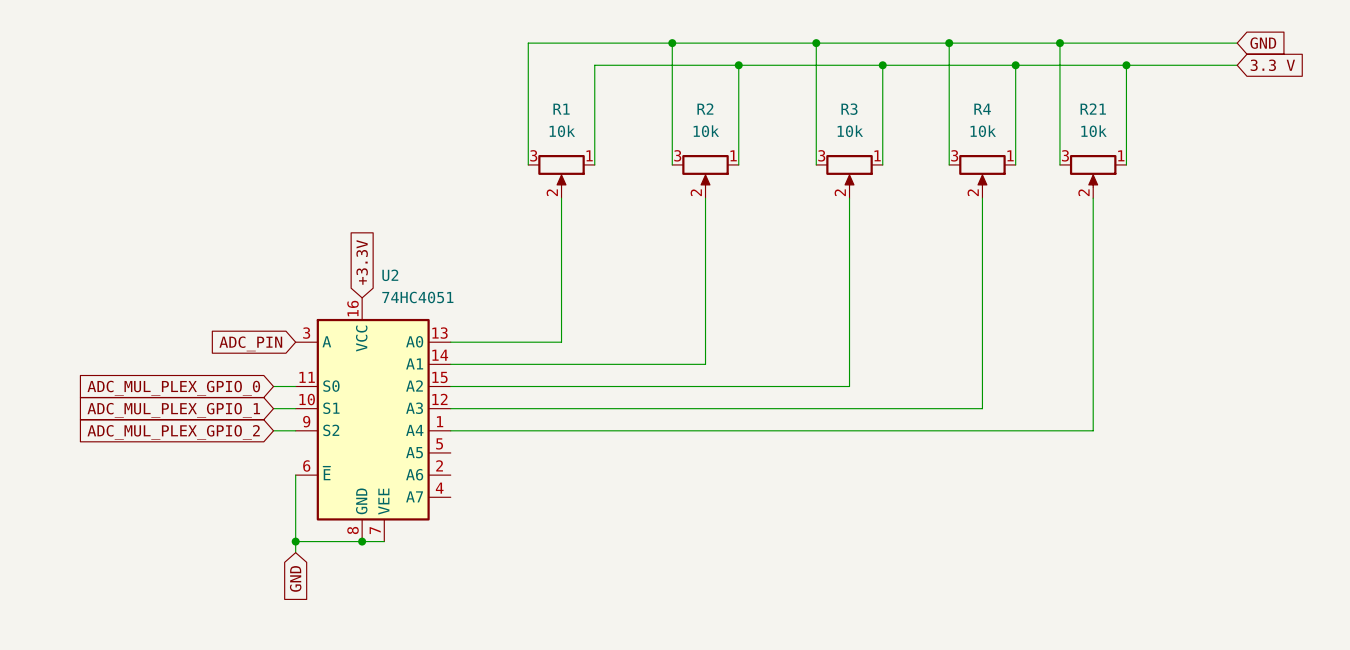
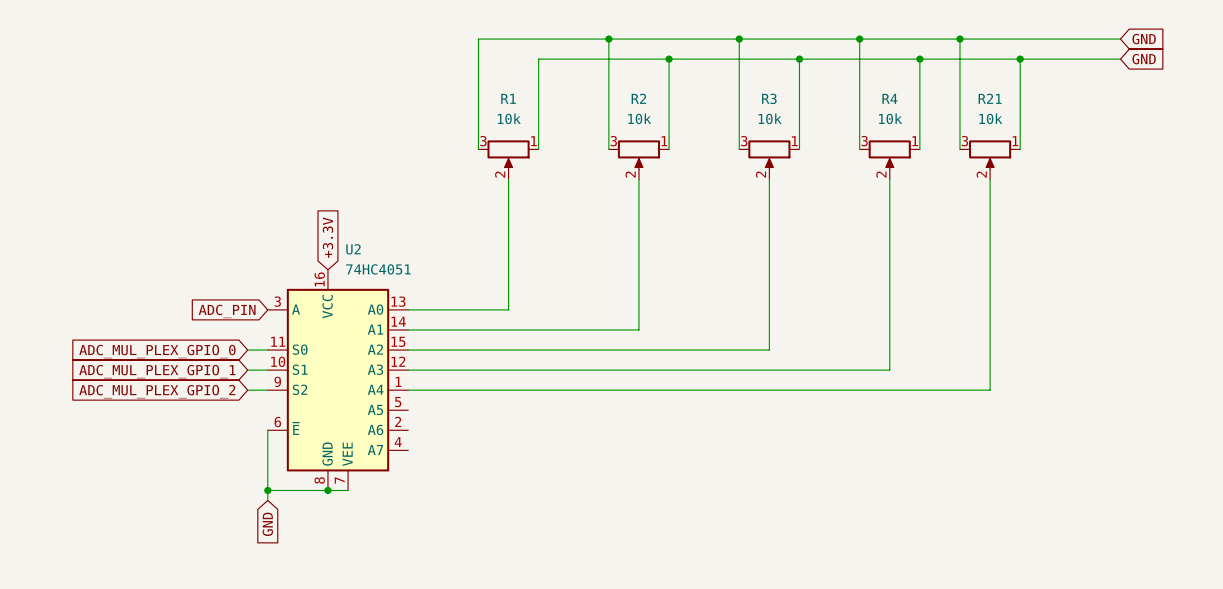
global label: 3.3 V (1272, 65) -> GND (1144, 59)

